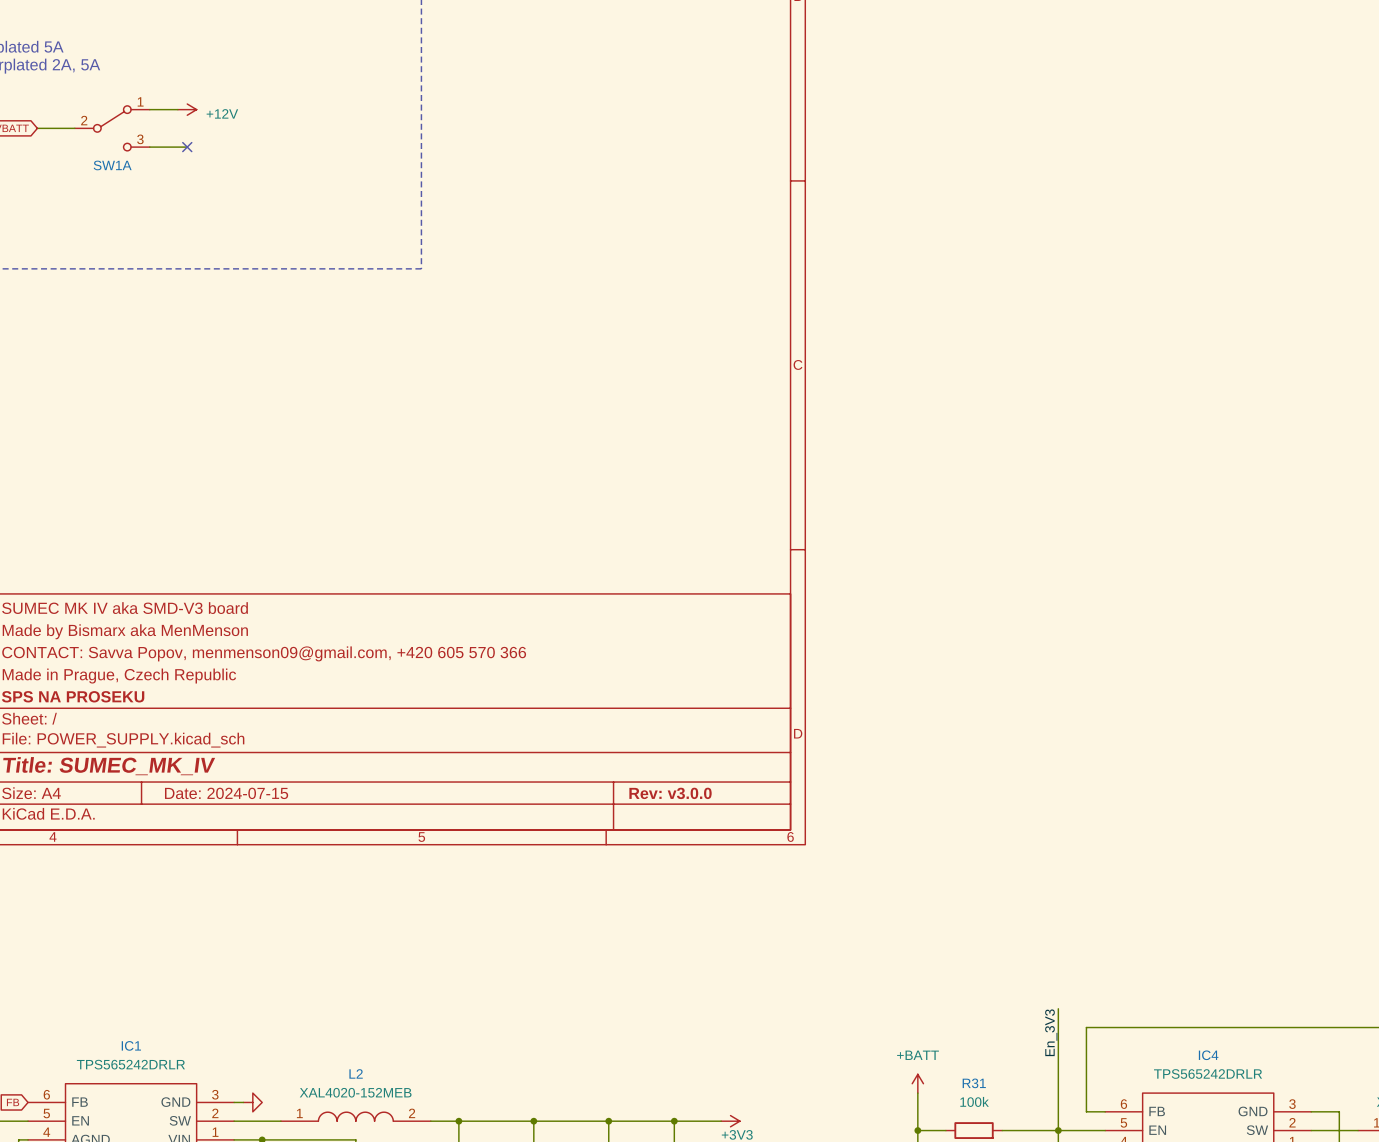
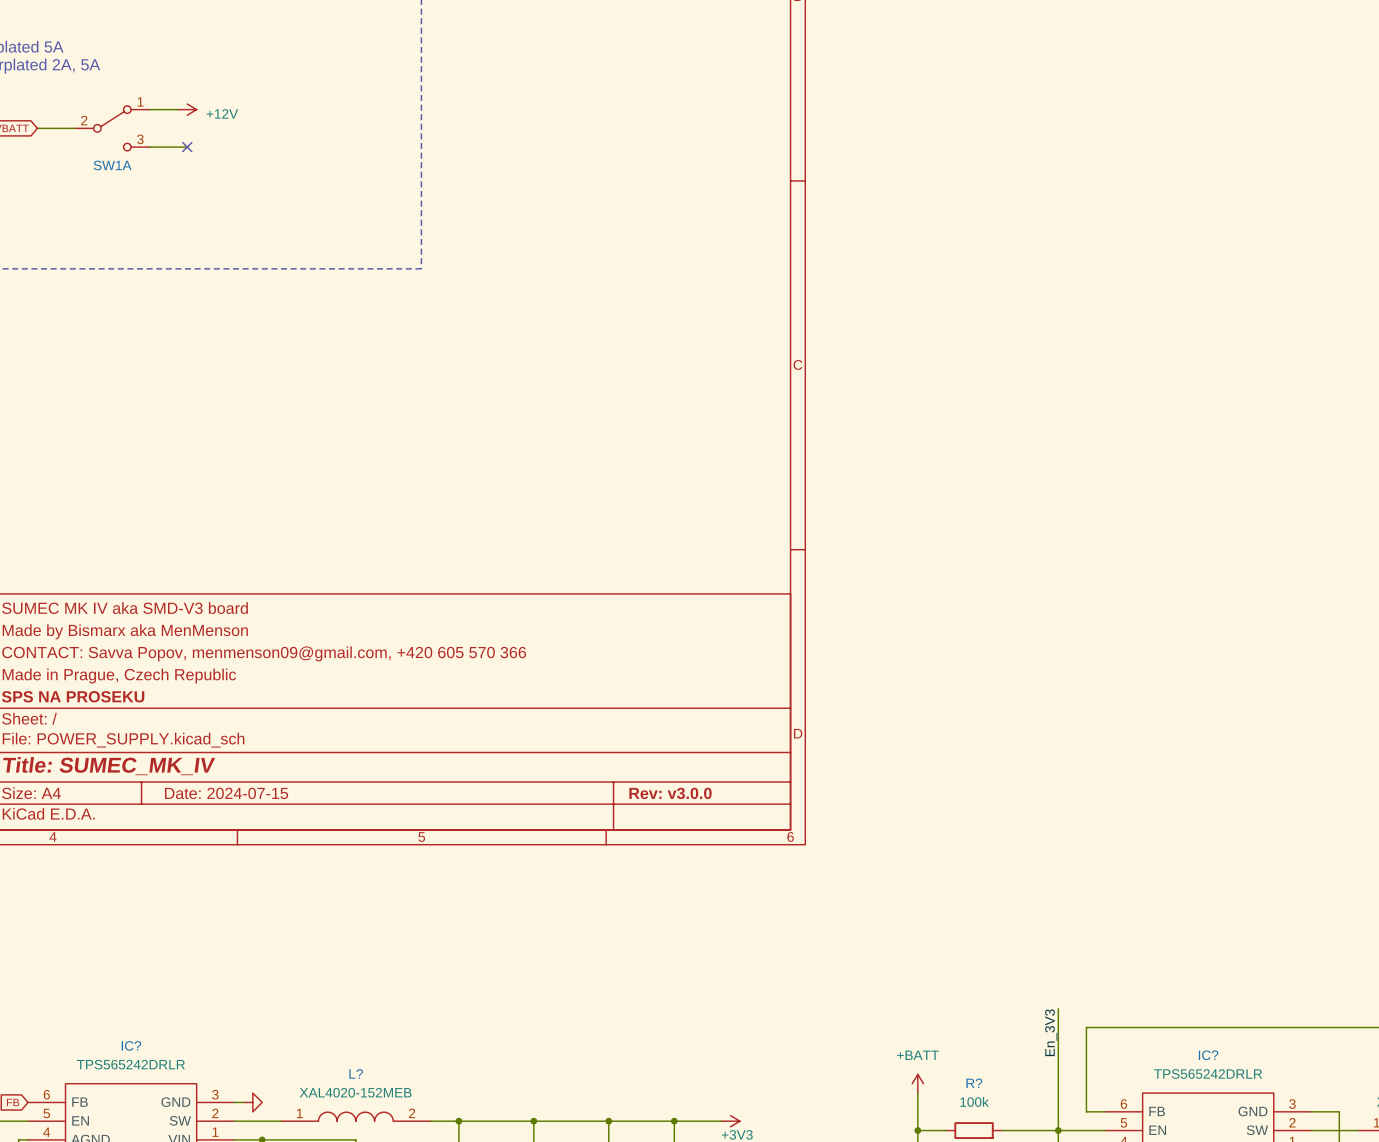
IC1 name: IC1 (131, 1045) -> IC? (131, 1045)
IC4 name: IC4 (1208, 1055) -> IC? (1208, 1055)
L2 name: L2 (356, 1073) -> L? (356, 1073)
R31 name: R31 (974, 1083) -> R? (974, 1083)

